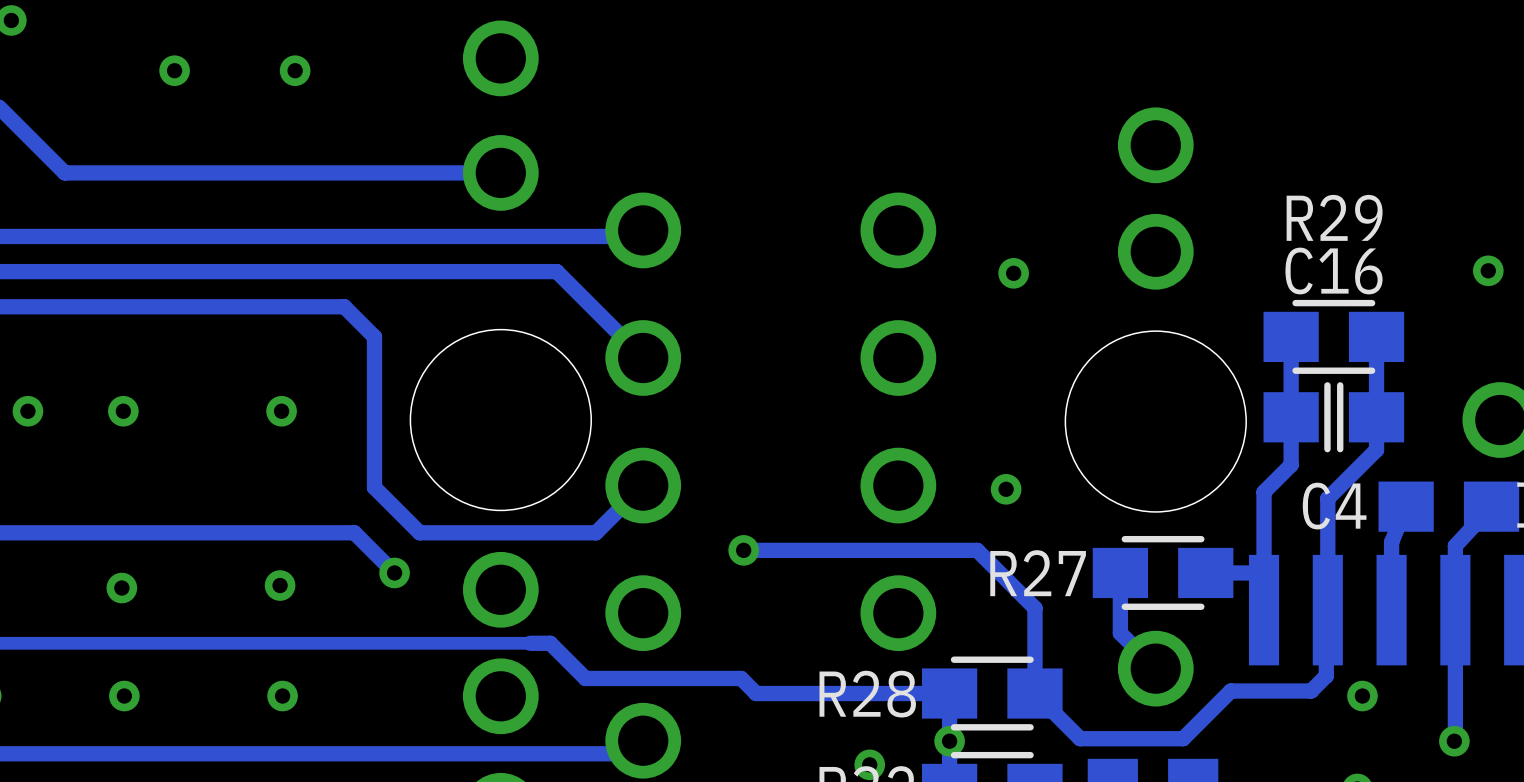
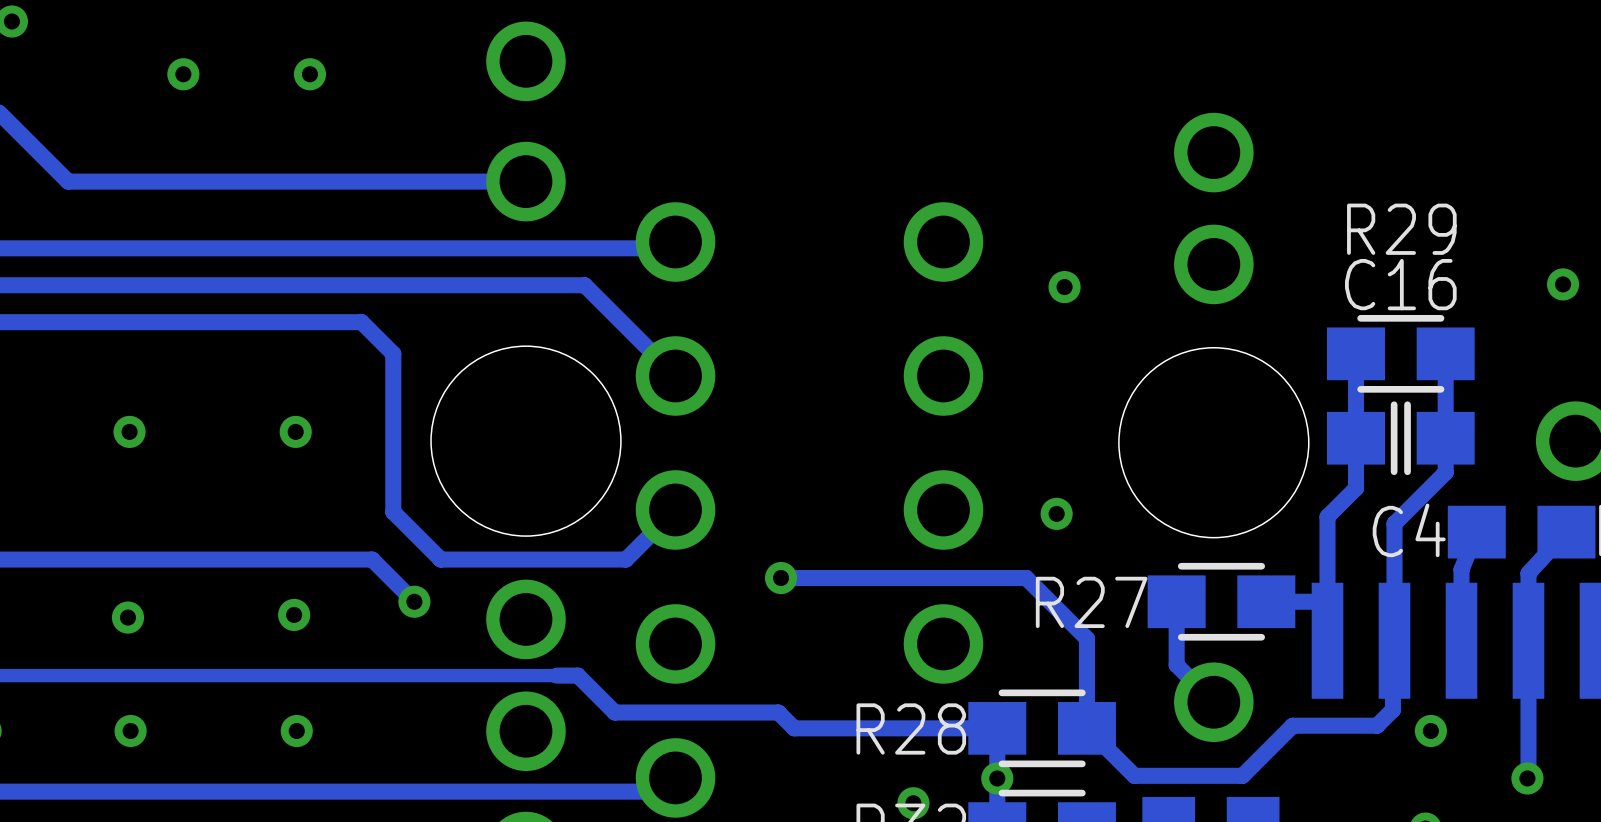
via: (27, 411) -> none

